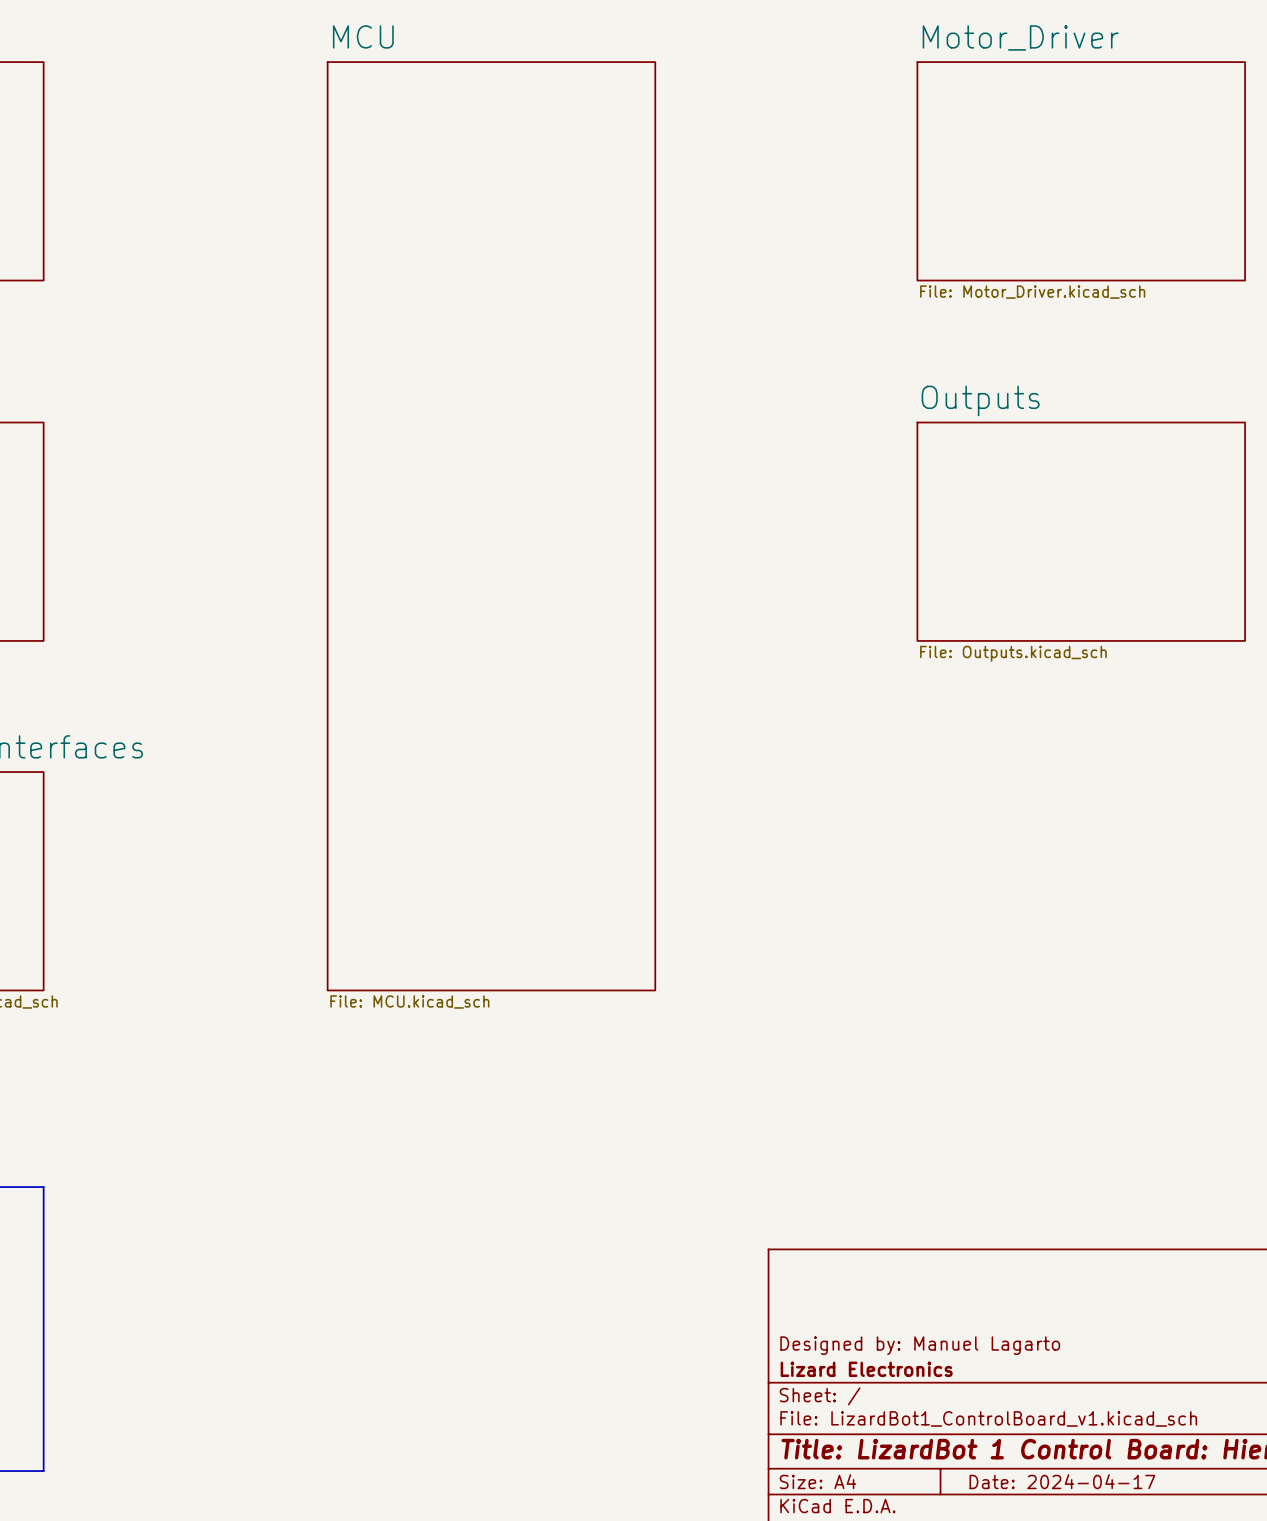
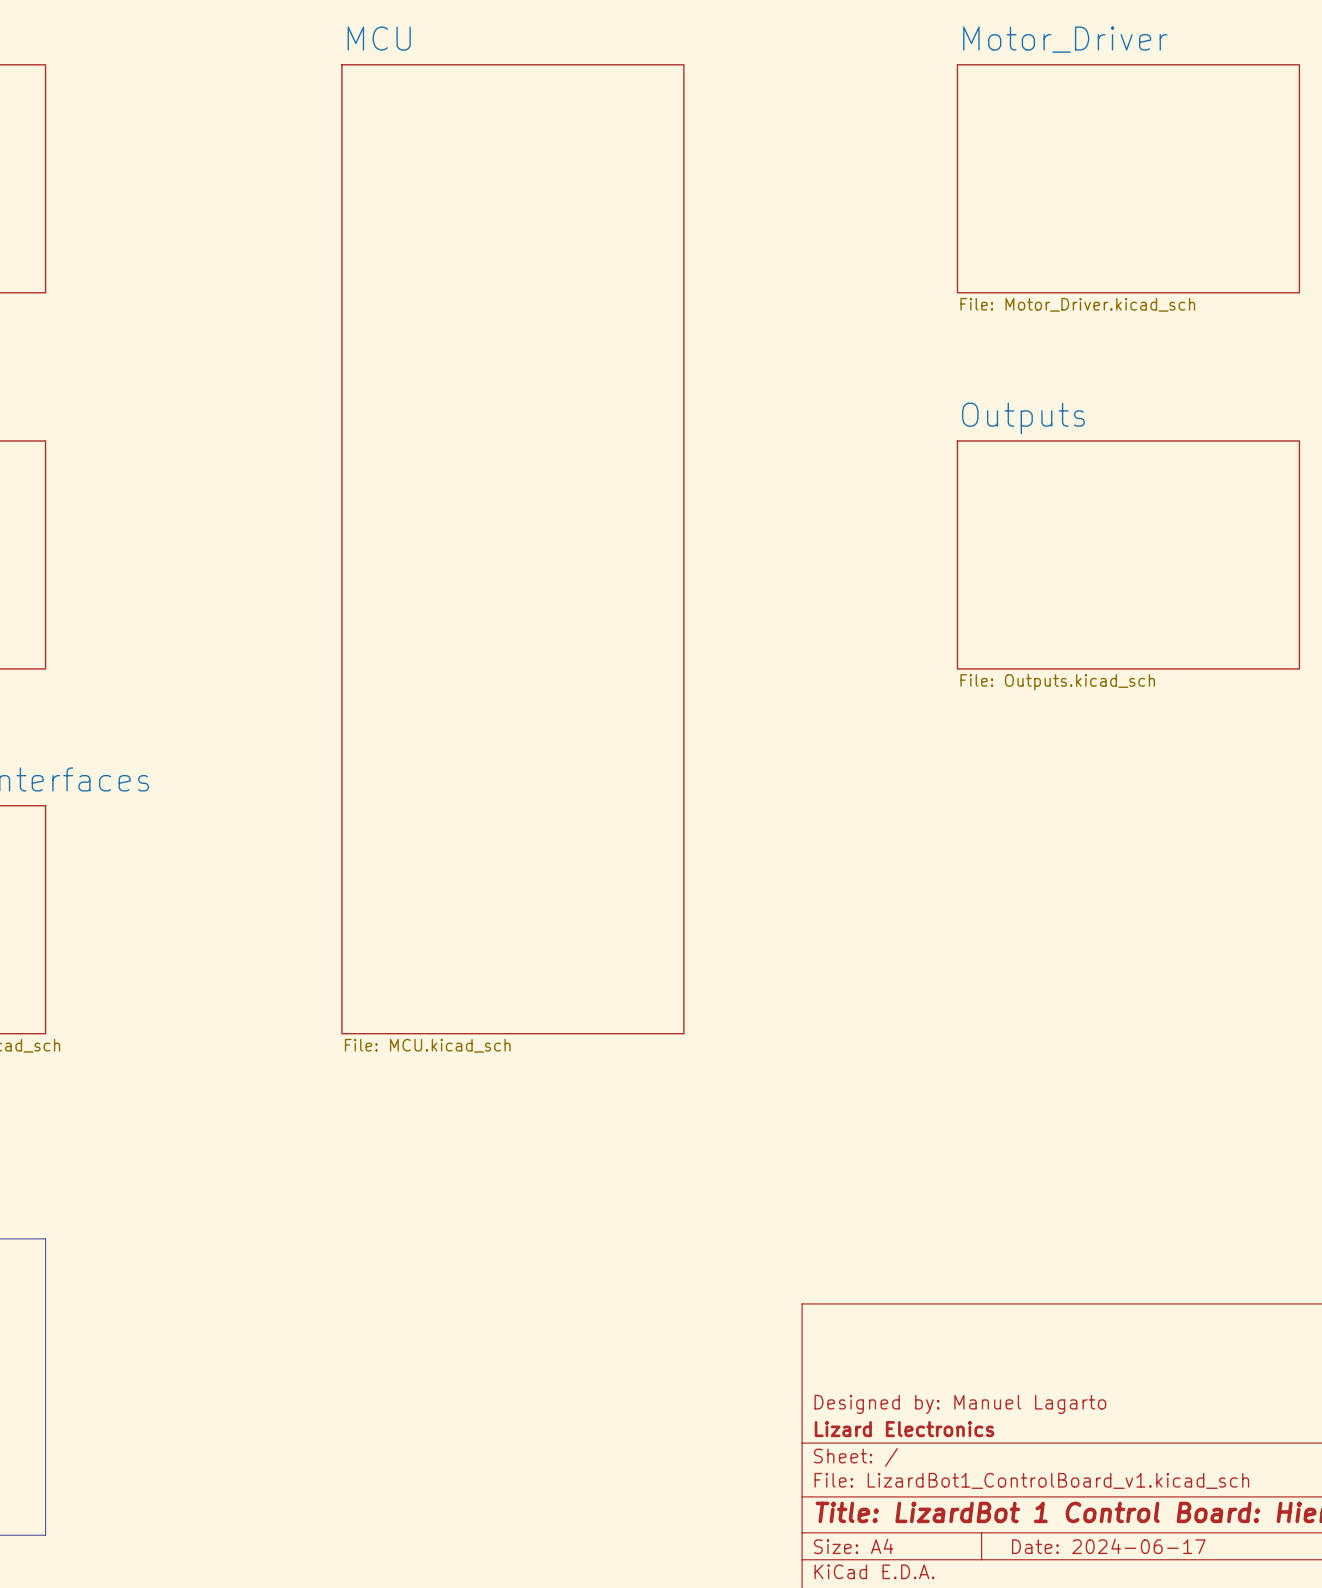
title block: Date: 2024-04-17 (1062, 1481) -> Date: 2024-06-17 (1108, 1546)

